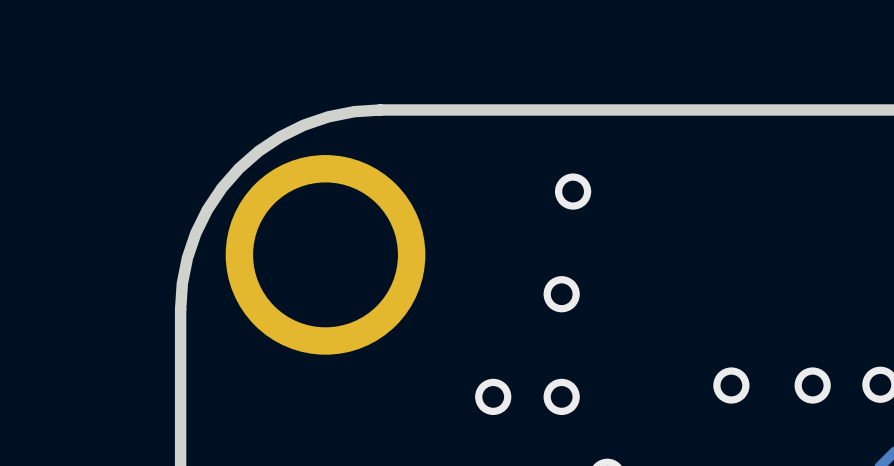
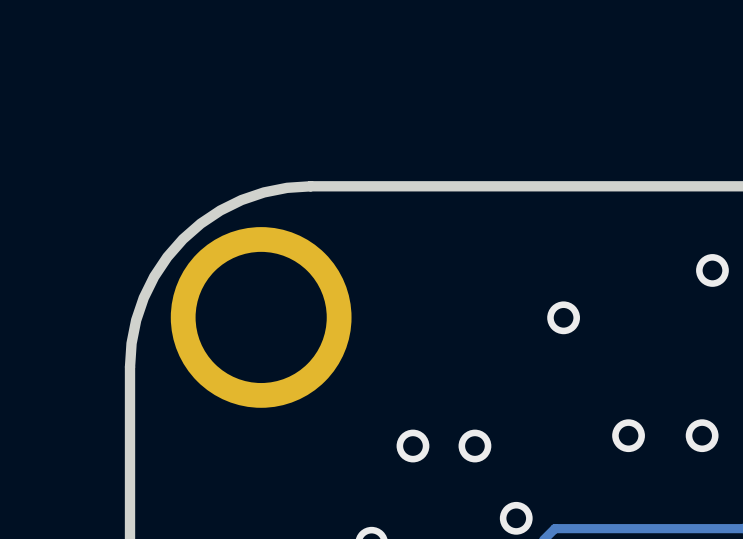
via: (573, 191) -> none
via: none -> (712, 270)
via: none -> (563, 317)
via: (561, 294) -> none

